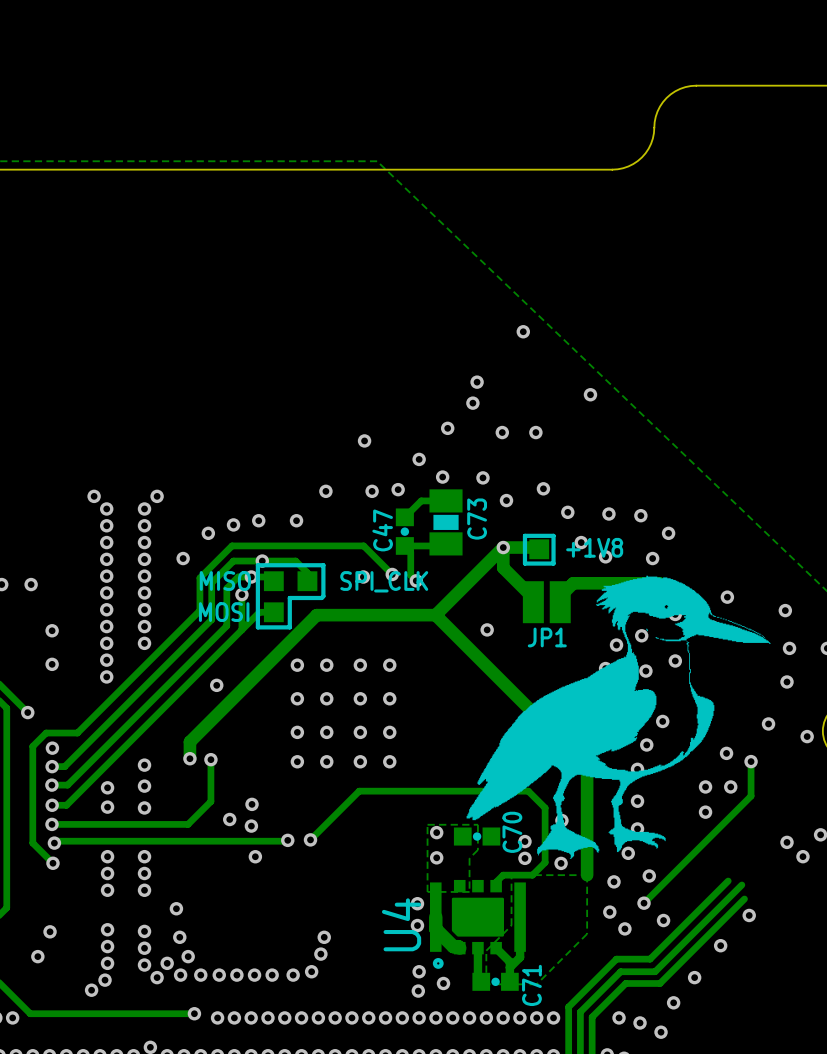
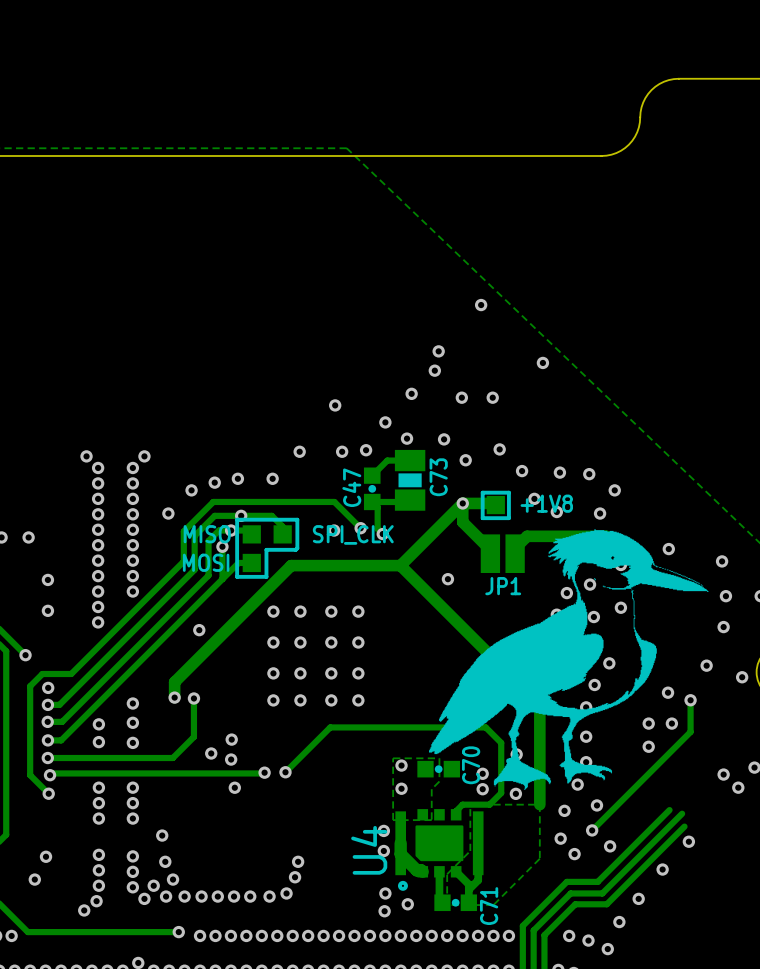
board edge: (738, 85) (690, 86) (675, 91) (662, 102) (657, 111) (652, 138) (645, 153) (633, 164) (612, 169) -> (678, 78) (659, 83) (648, 93) (641, 107) (637, 132) (632, 140) (620, 150) (606, 155) (563, 155)

